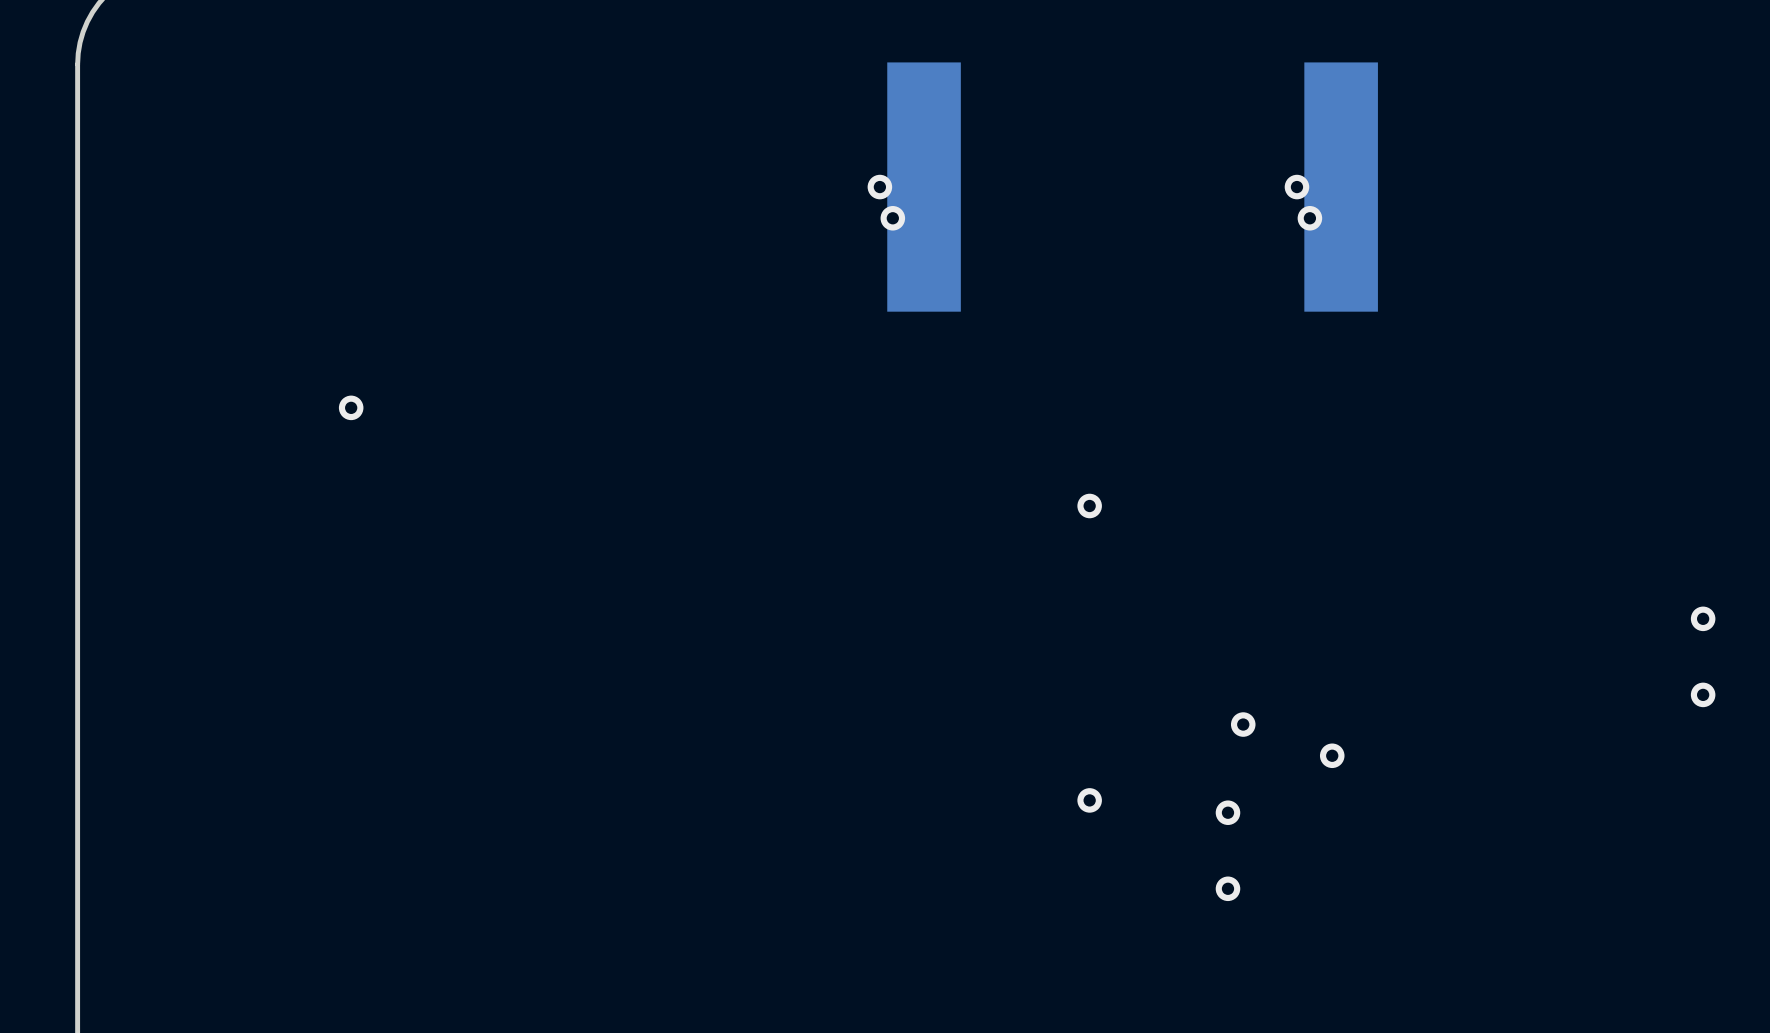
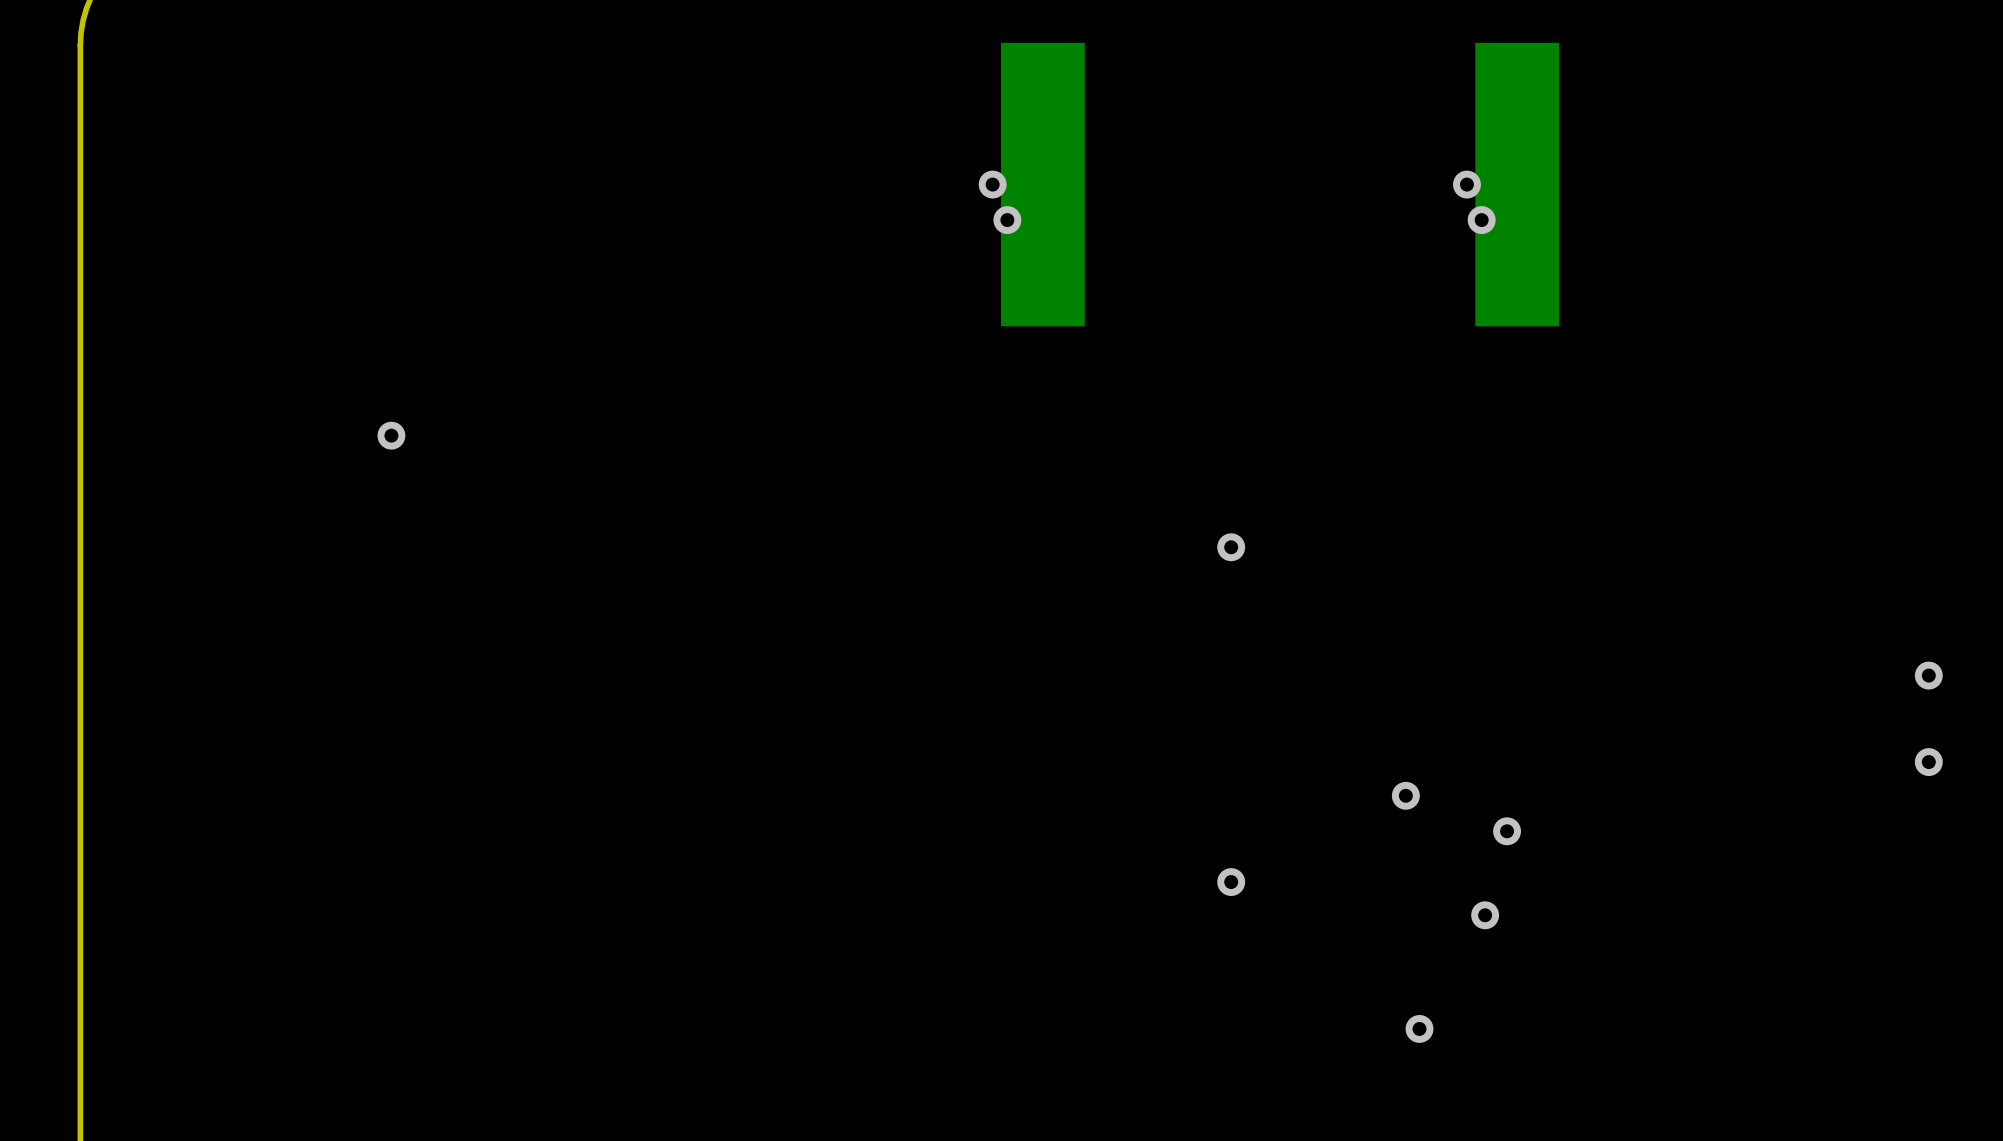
via: (1227, 812) -> none
via: none -> (1485, 915)
via position: (1227, 888) -> (1419, 1028)

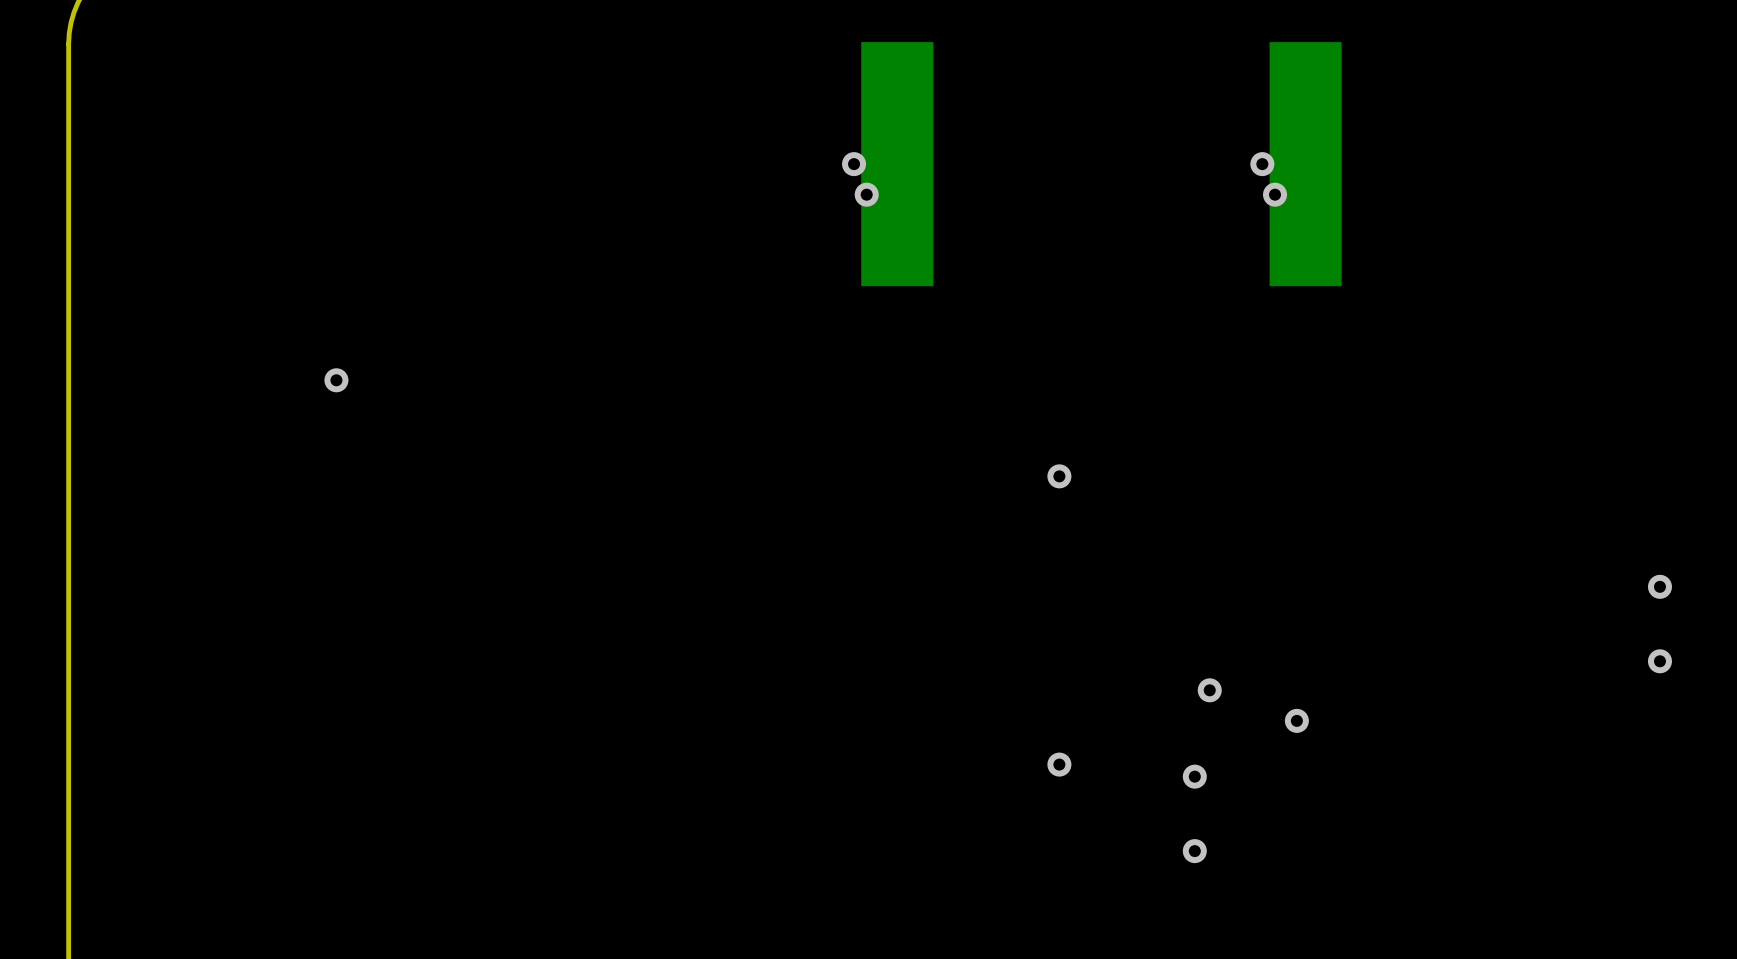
via: none -> (1194, 776)
via: (1485, 915) -> none
via position: (1419, 1028) -> (1194, 851)

